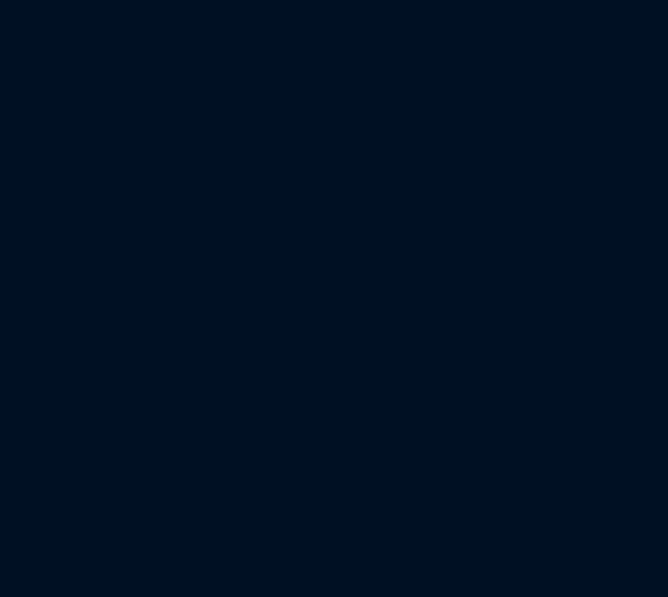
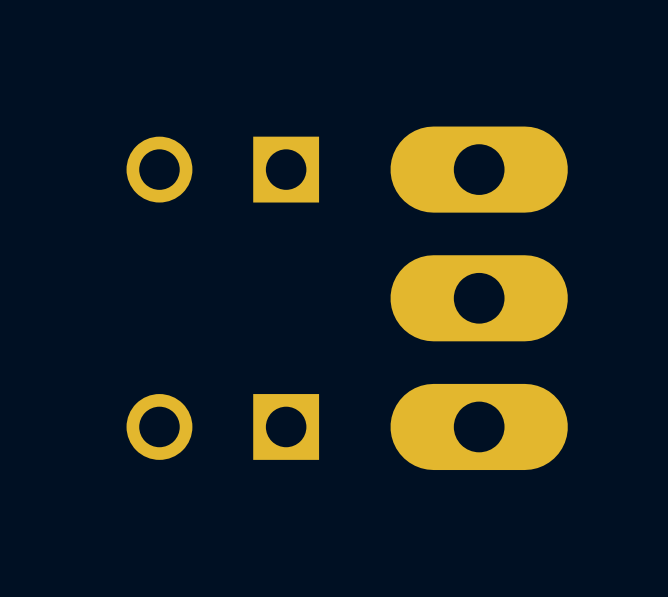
part: none -> (222, 169)
part: none -> (479, 298)
part: none -> (222, 426)

